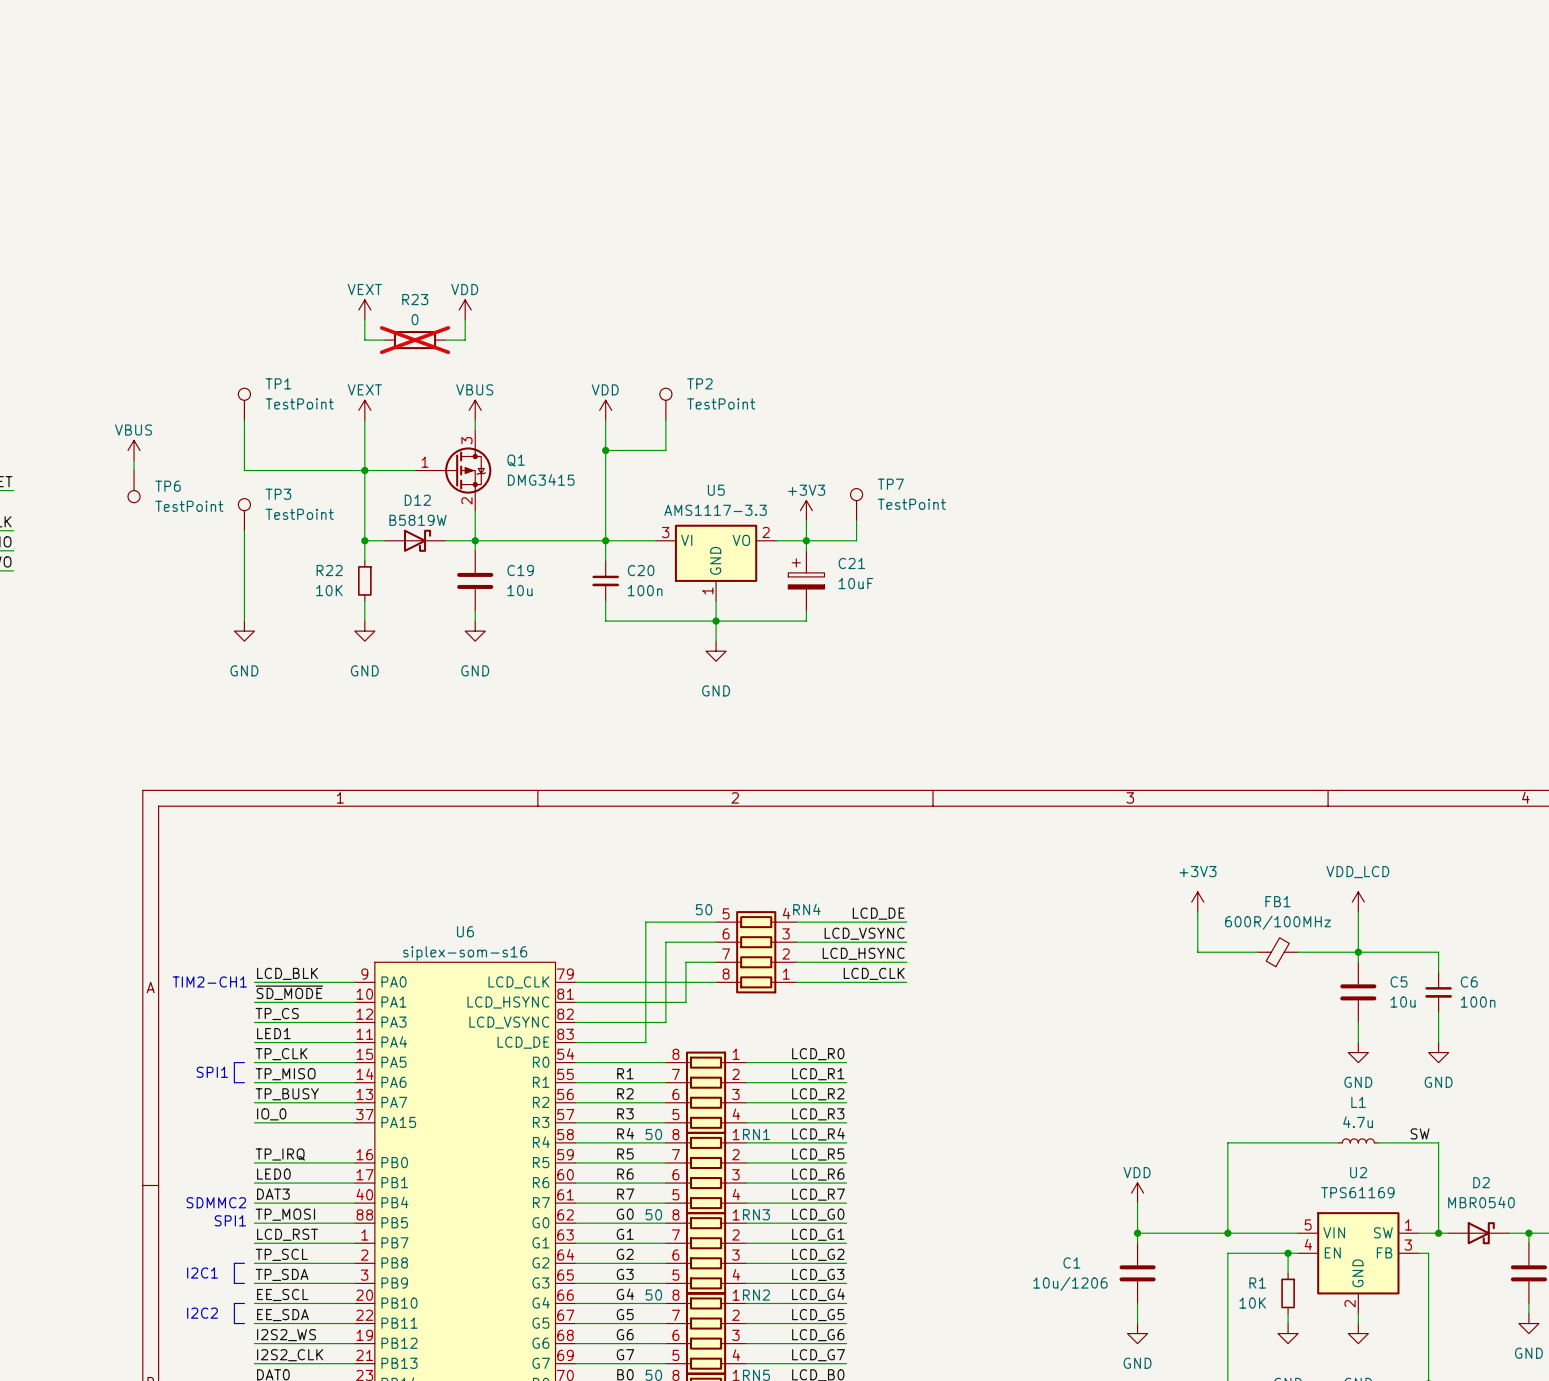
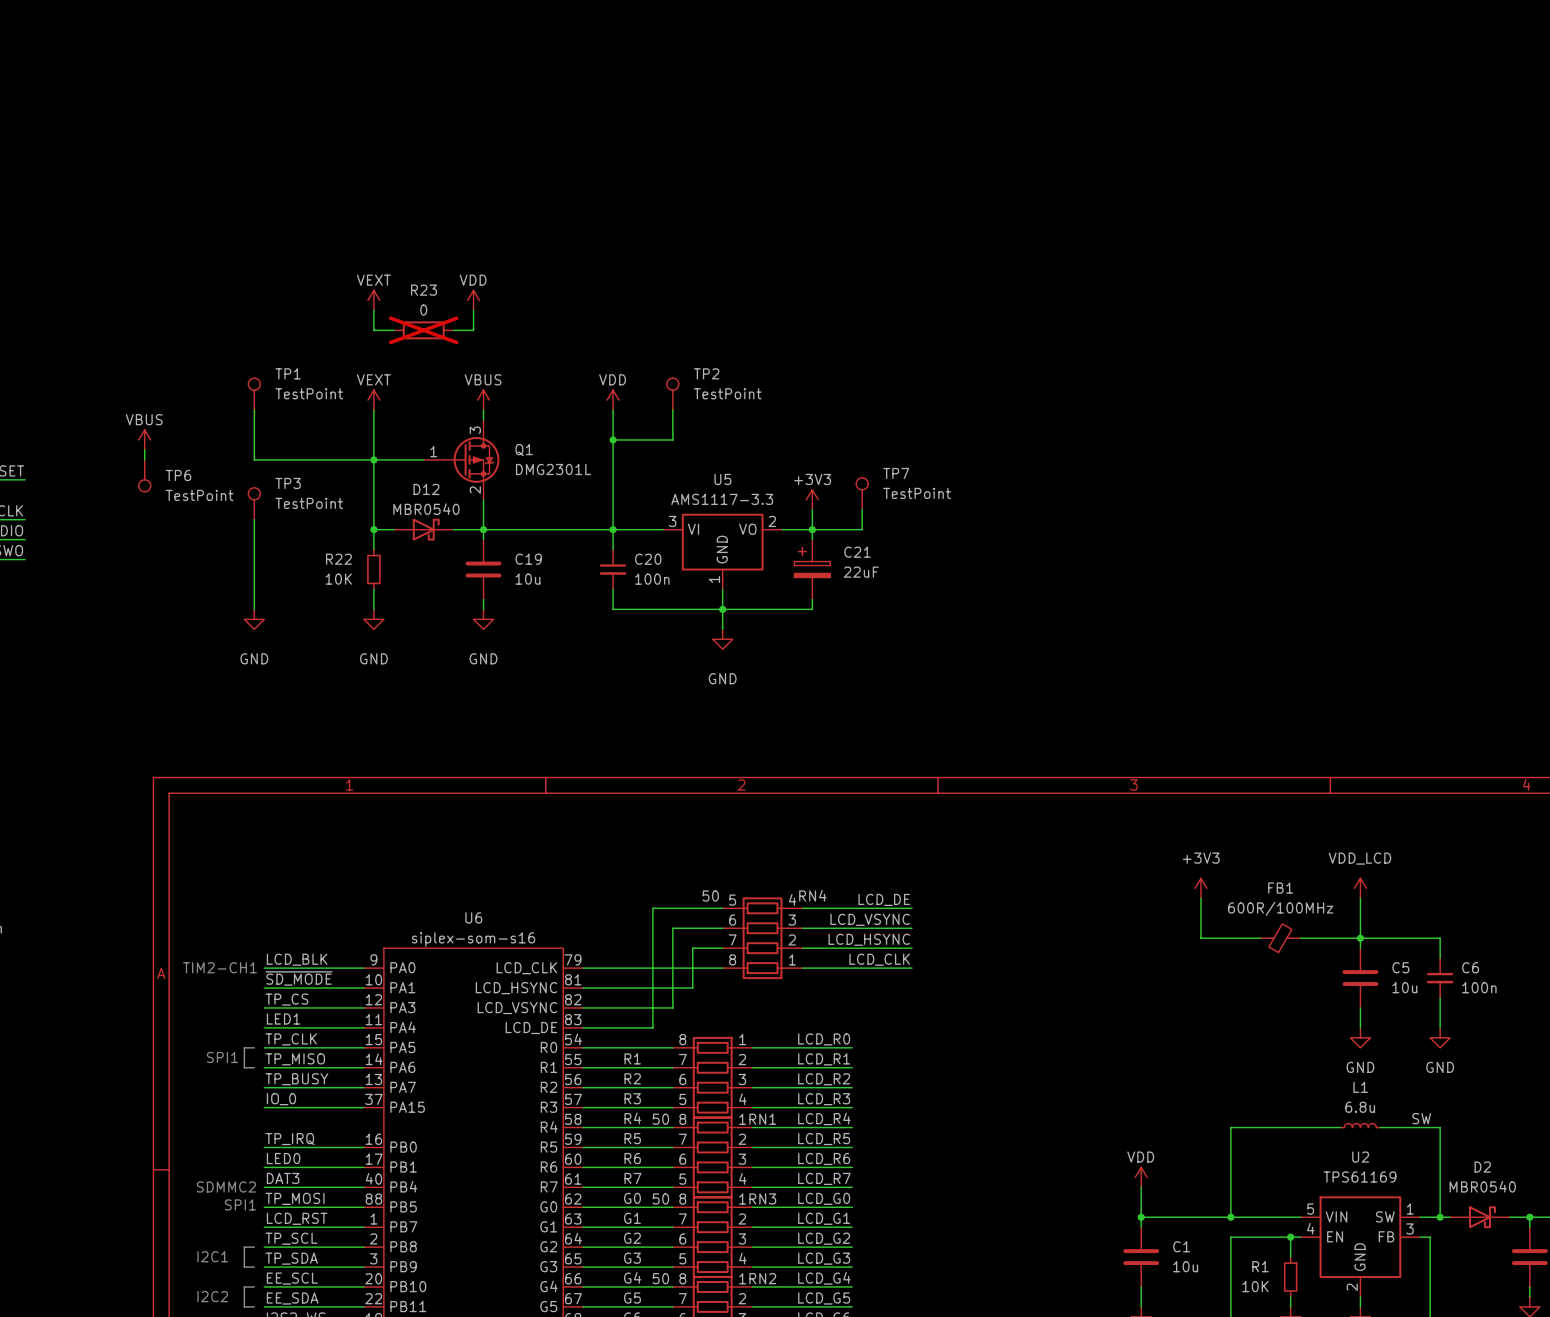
Q1 value: DMG3415 (541, 479) -> DMG2301L (553, 469)
D12 value: B5819W (418, 520) -> MBR0540 (426, 509)
C21 value: 10uF (855, 583) -> 22uF (861, 572)
L1 value: 4.7u (1358, 1122) -> 6.8u (1360, 1107)
C1 name position: C1 (1071, 1262) -> C1 (1181, 1246)
C1 value: 10u/1206 (1070, 1283) -> 10u (1185, 1266)

